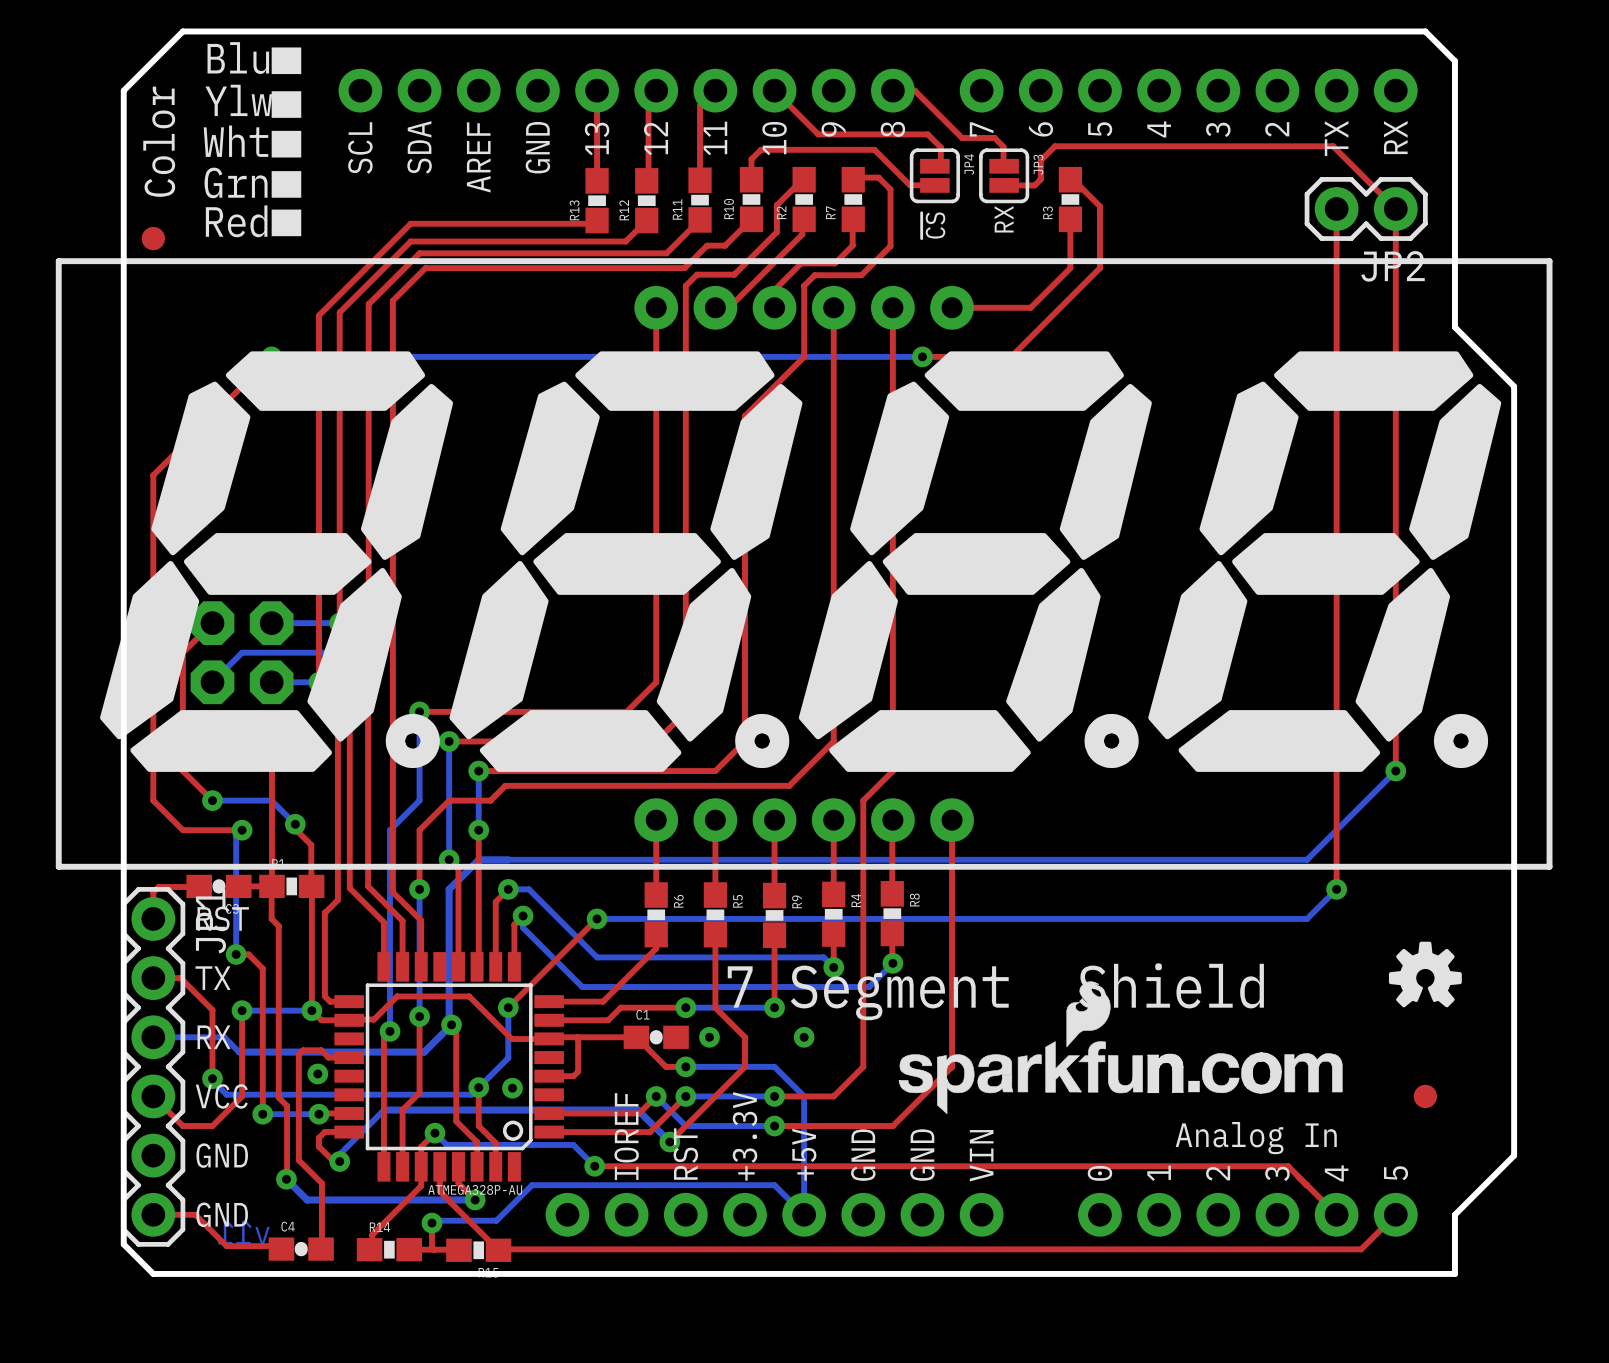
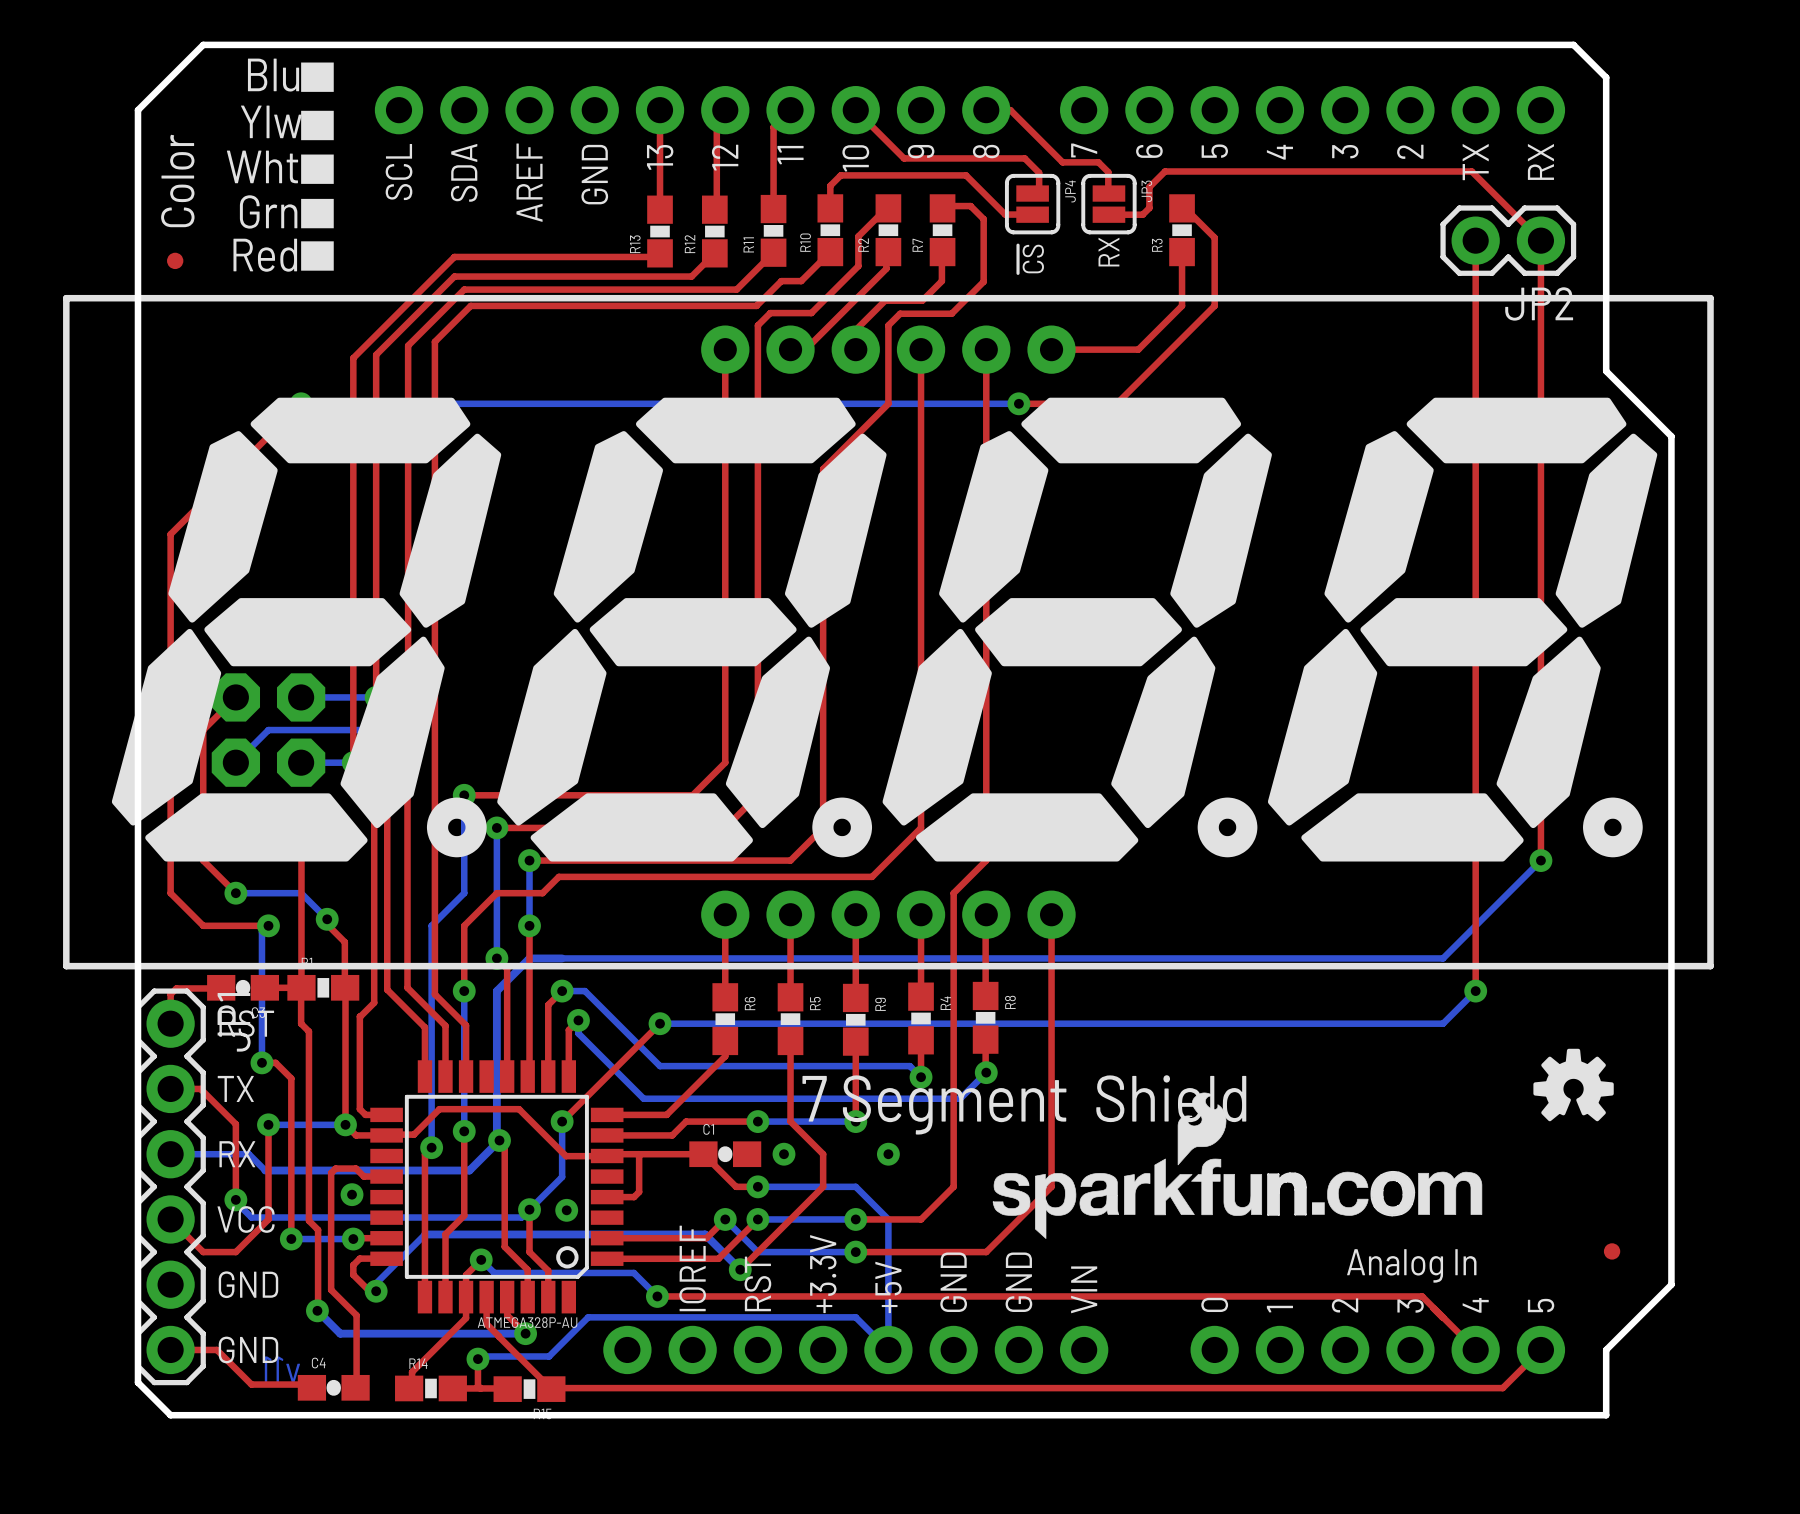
part footprint: [141, 226, 165, 251] -> [167, 252, 184, 270]
part: (1425, 1096) -> none
part: none -> (1612, 1251)

